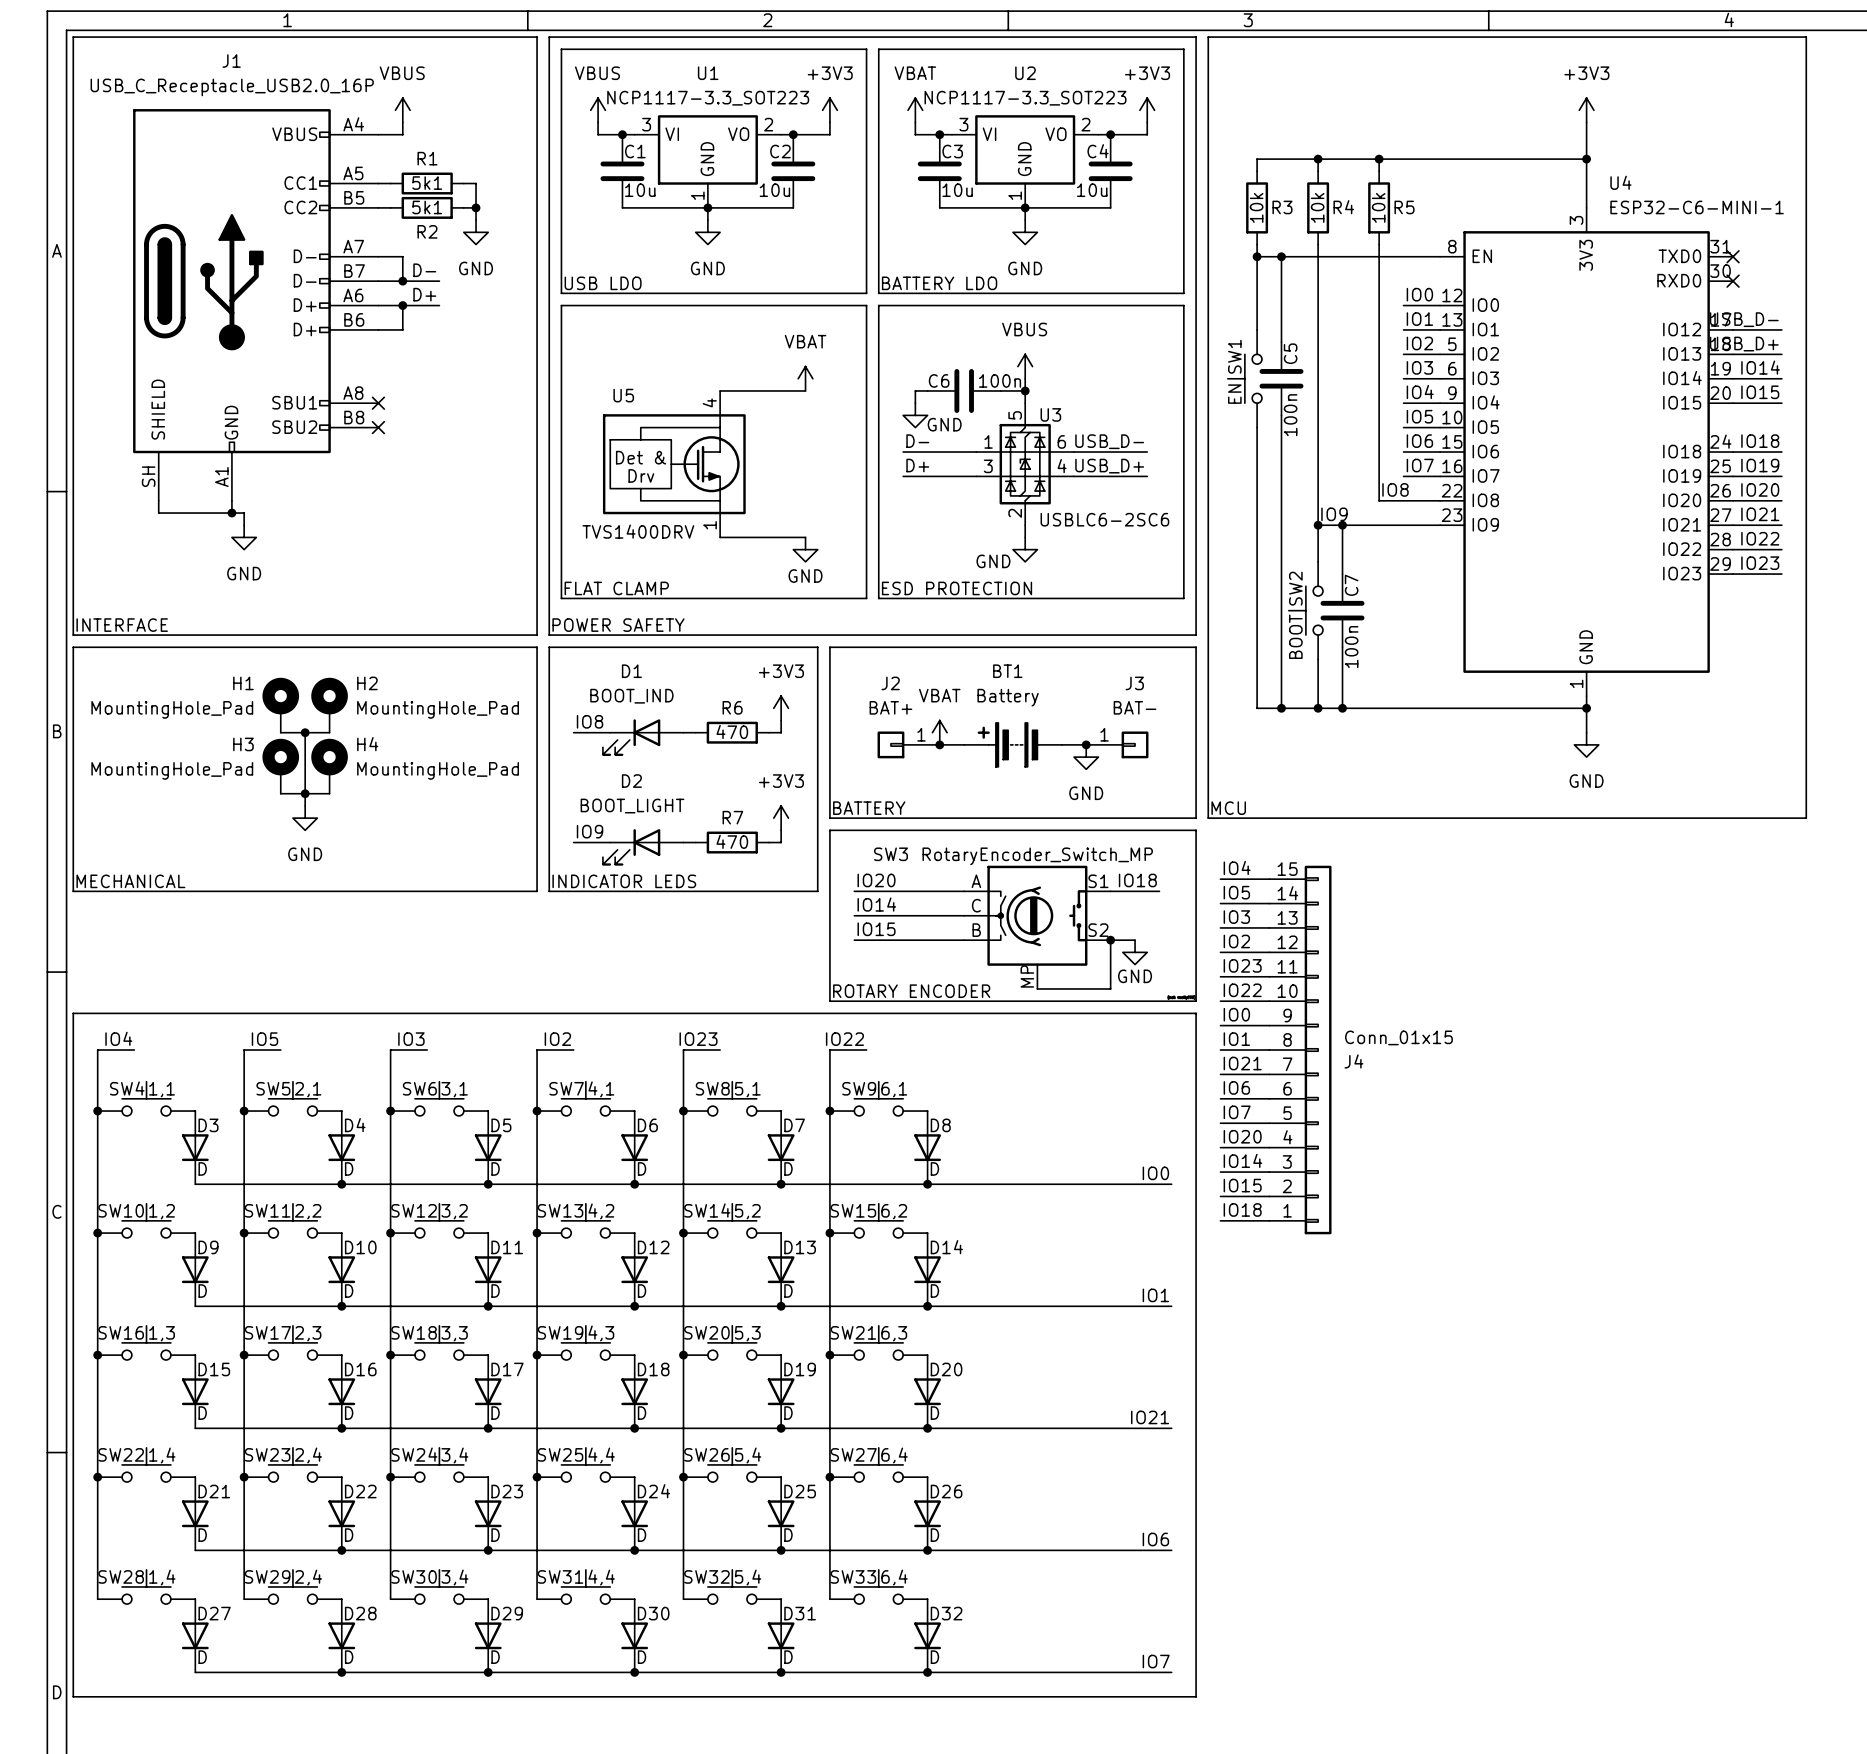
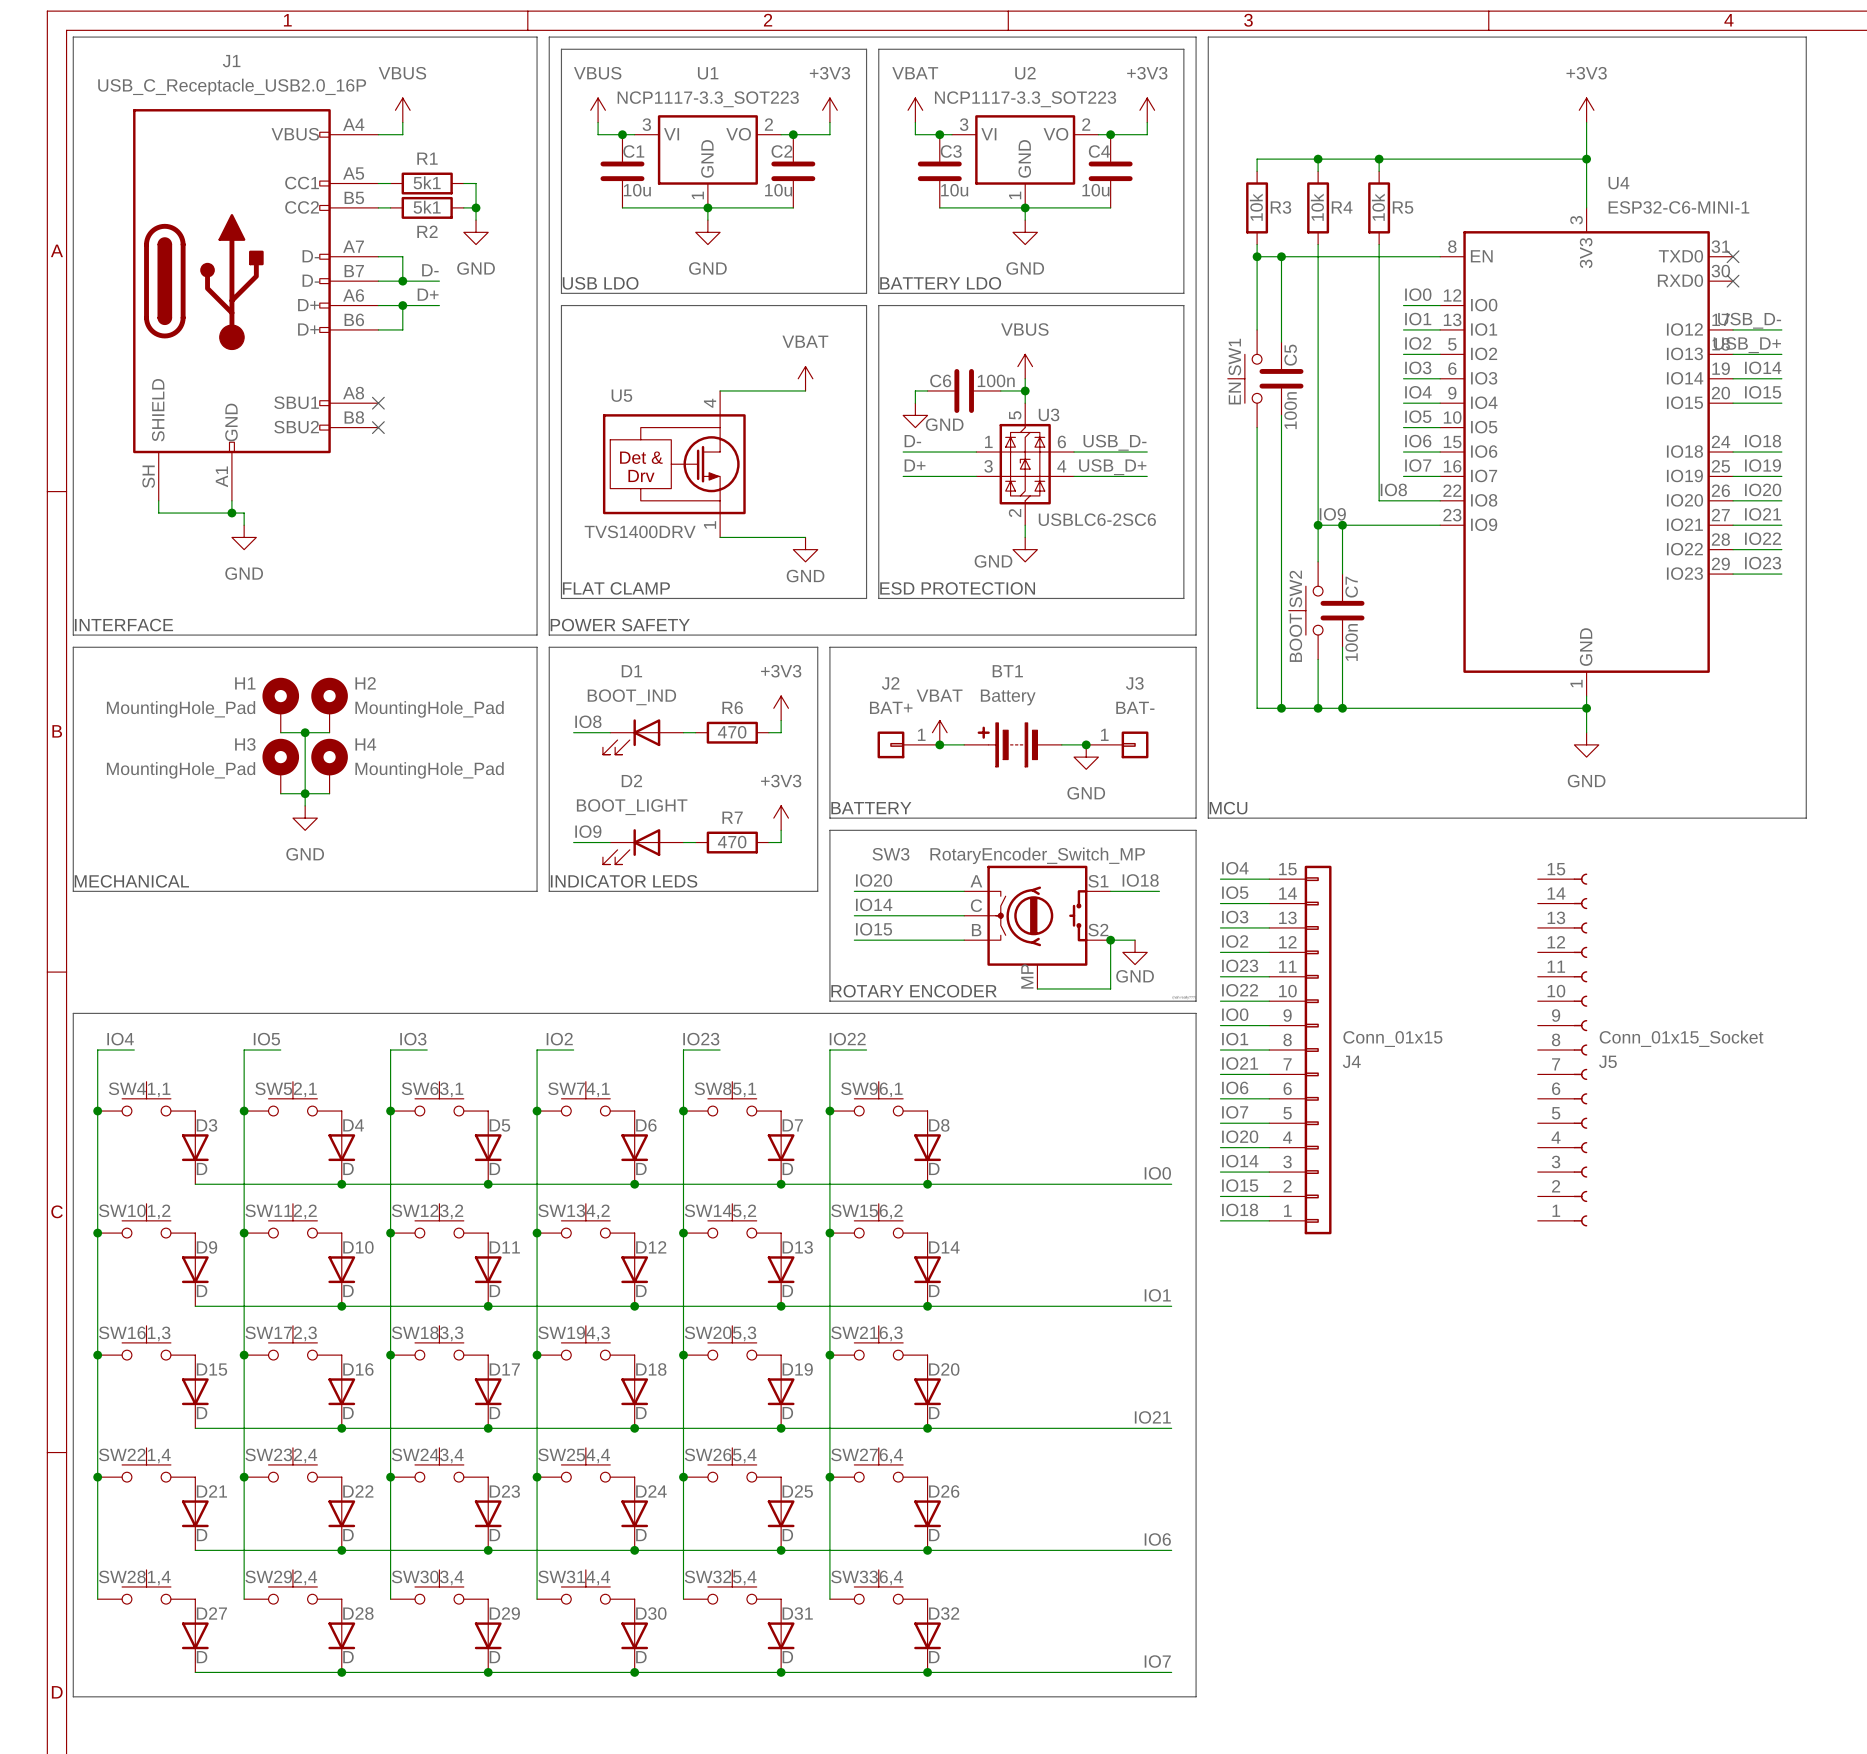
J5: none -> Conn_01x15_Socket (1562, 1050)

